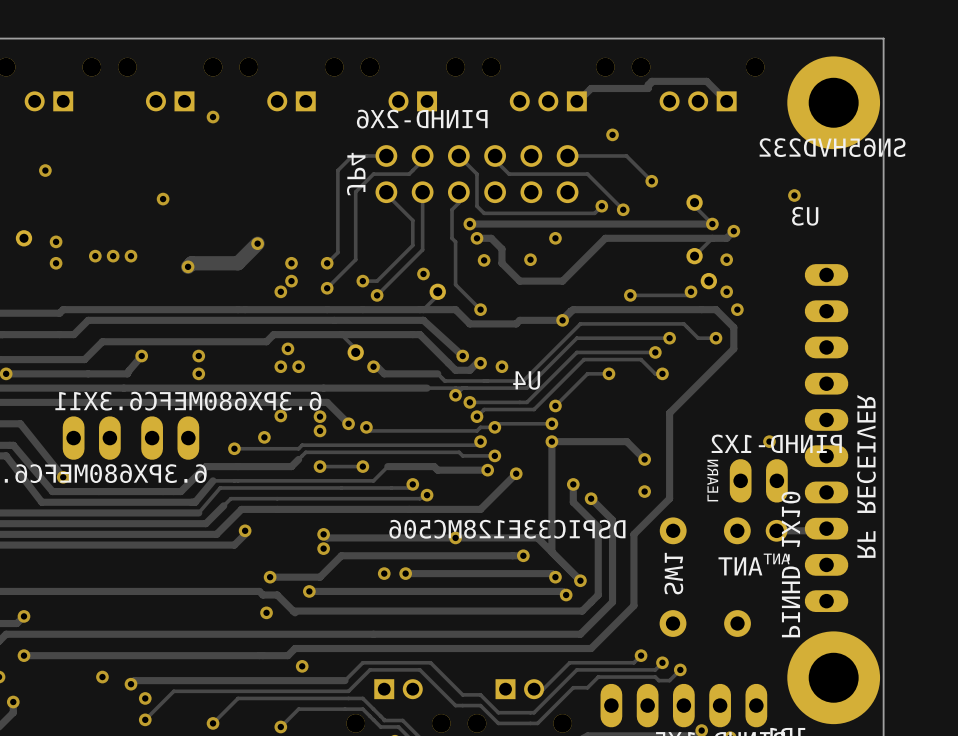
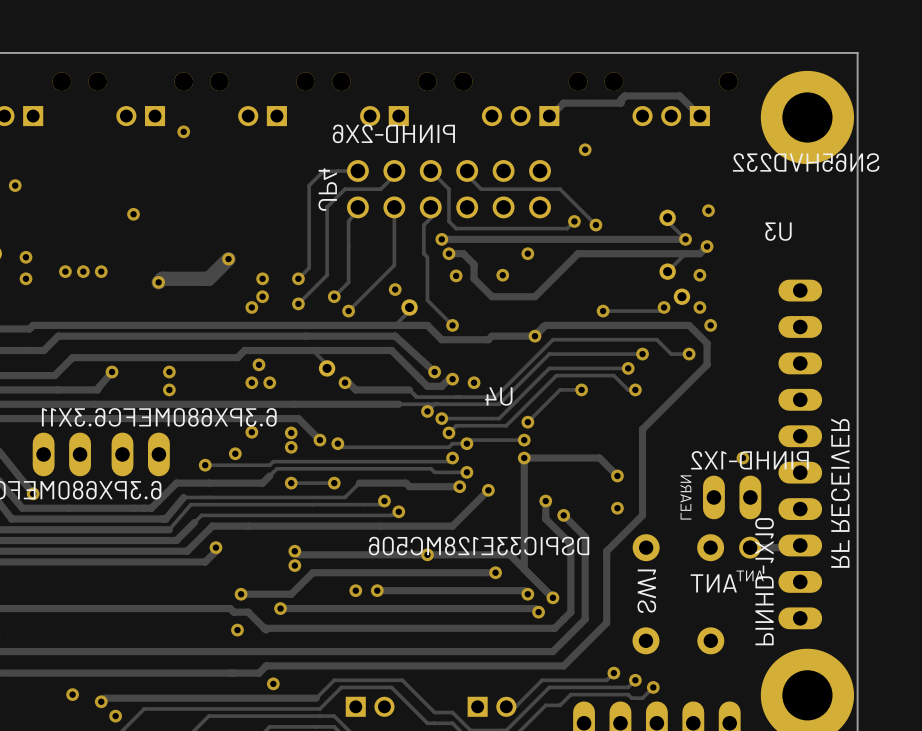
track: (567, 155) (626, 155) (651, 181) -> none
via: (651, 181) -> none
track: (386, 194) (412, 220) (412, 245) (377, 281) (362, 281) -> (357, 209) (348, 221) (348, 282) (334, 296)
via: none -> (708, 210)
via: (794, 195) -> none

